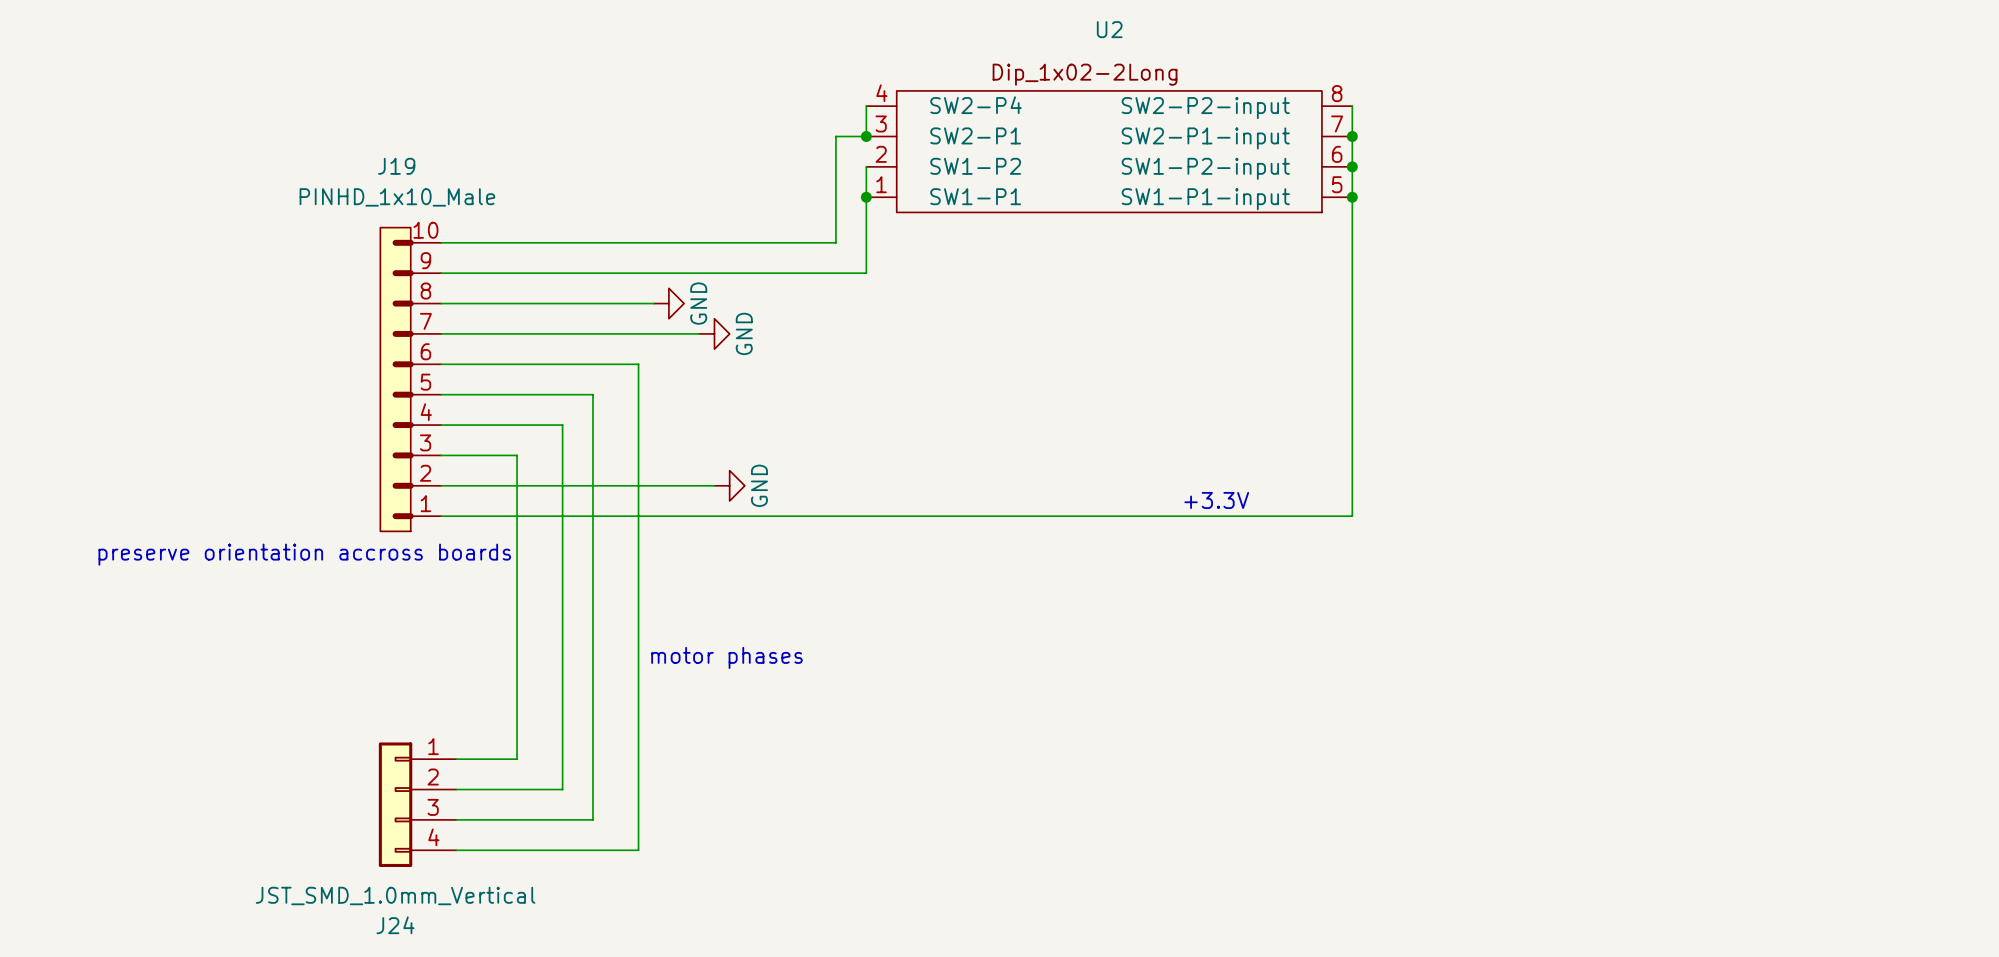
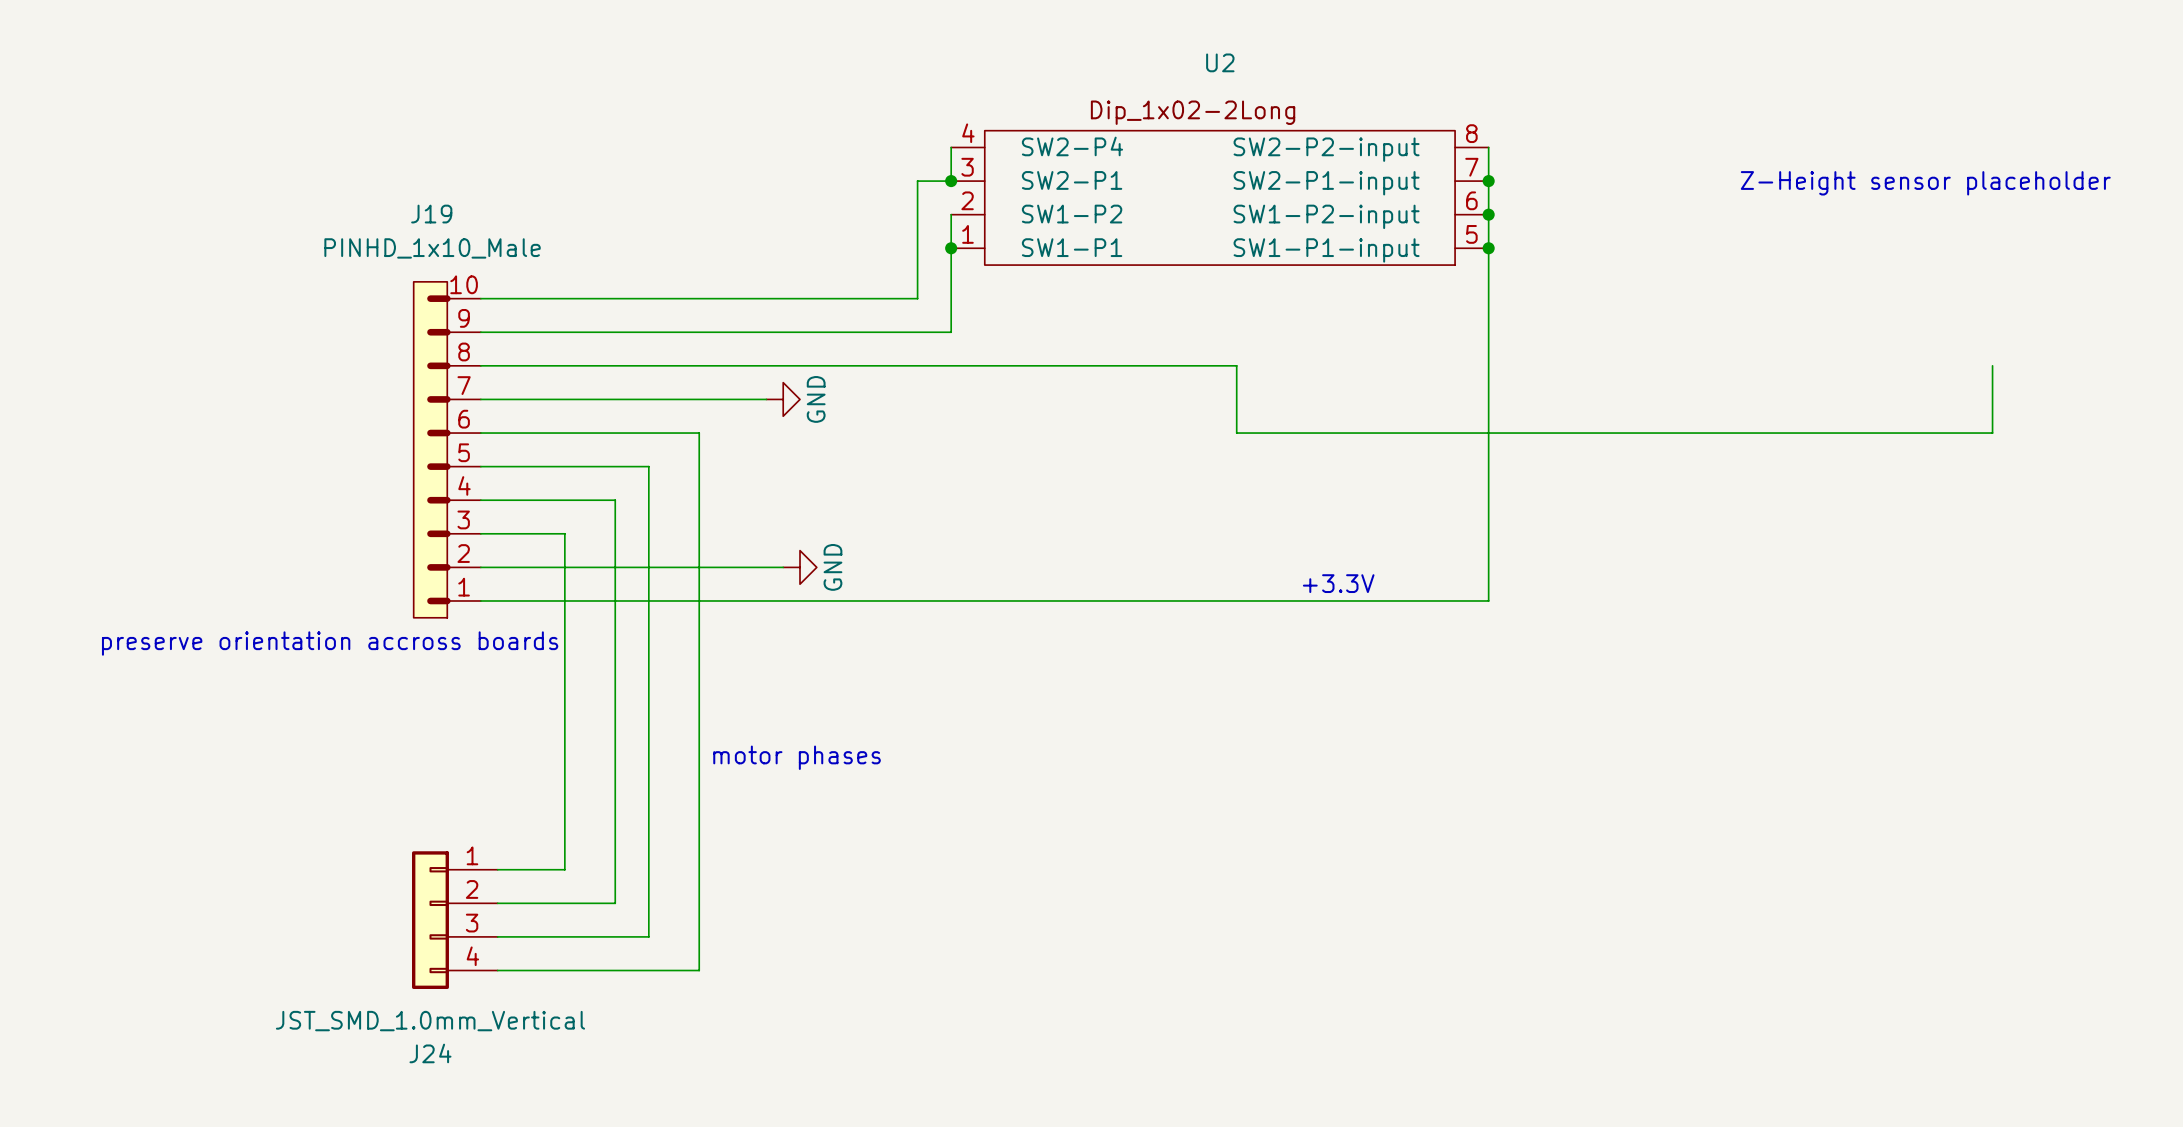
text: none -> Z-Height sensor placeholder (1925, 183)
wire: none -> (716, 365) (1236, 365) (1236, 433) (1992, 433) (1992, 365)
power symbol: GND (668, 303) -> none

